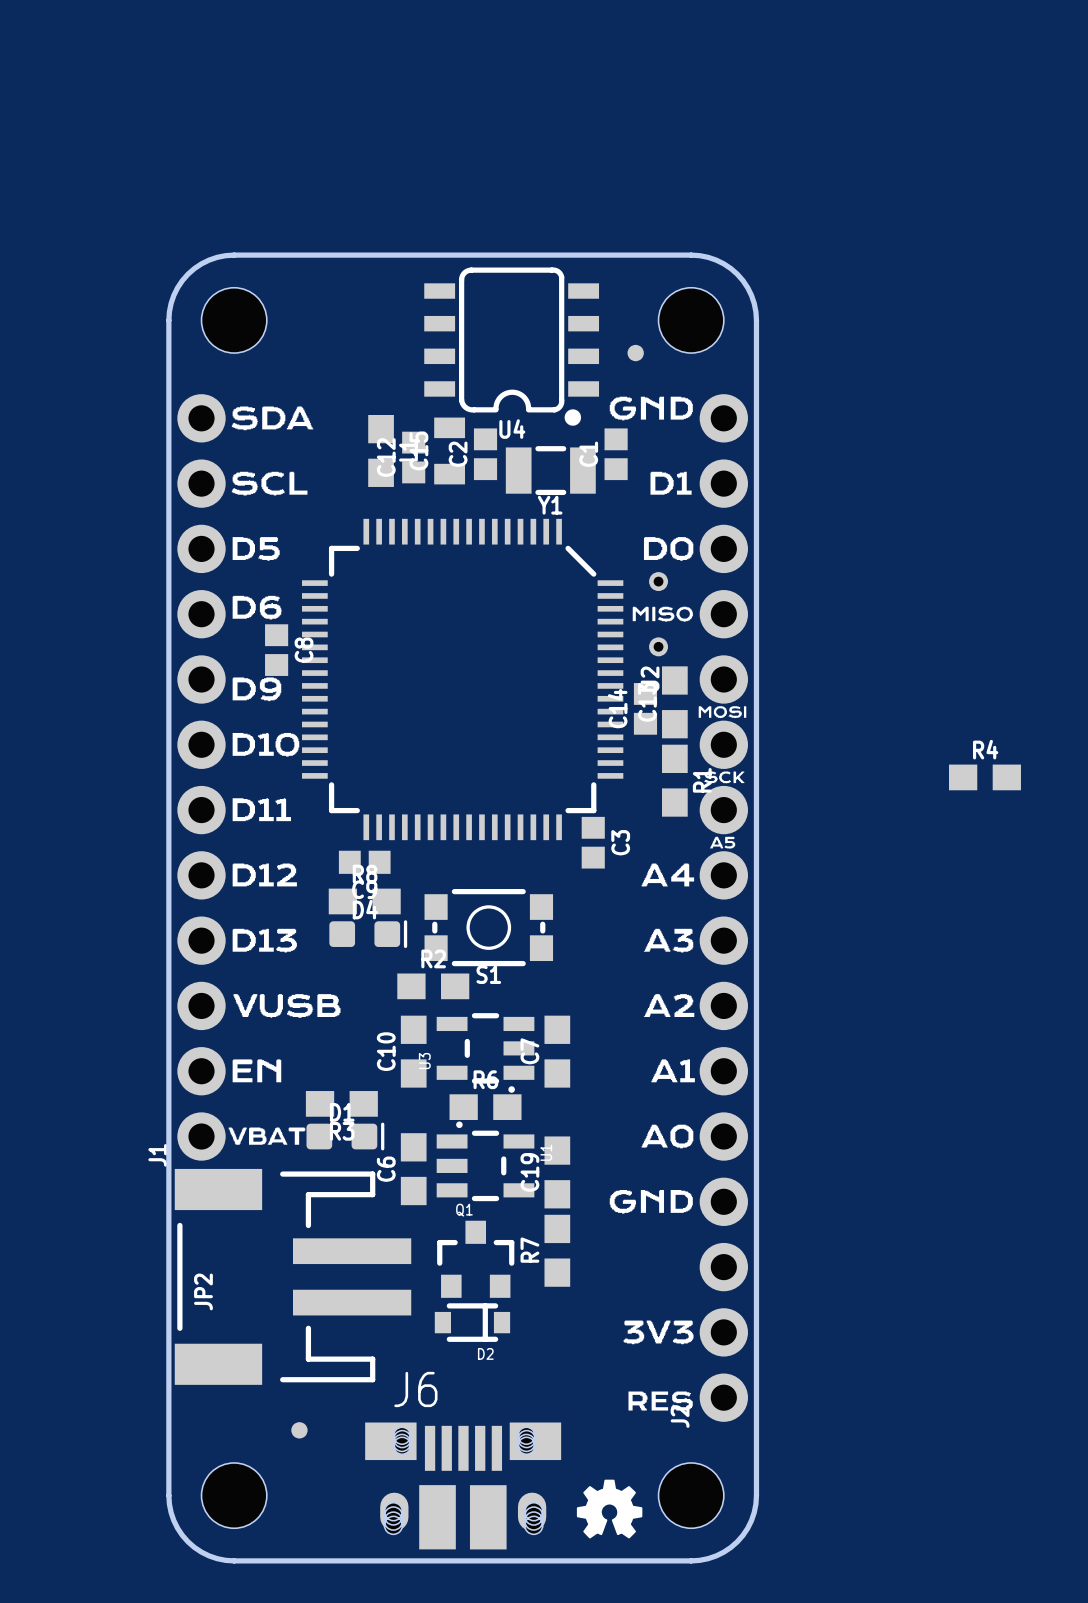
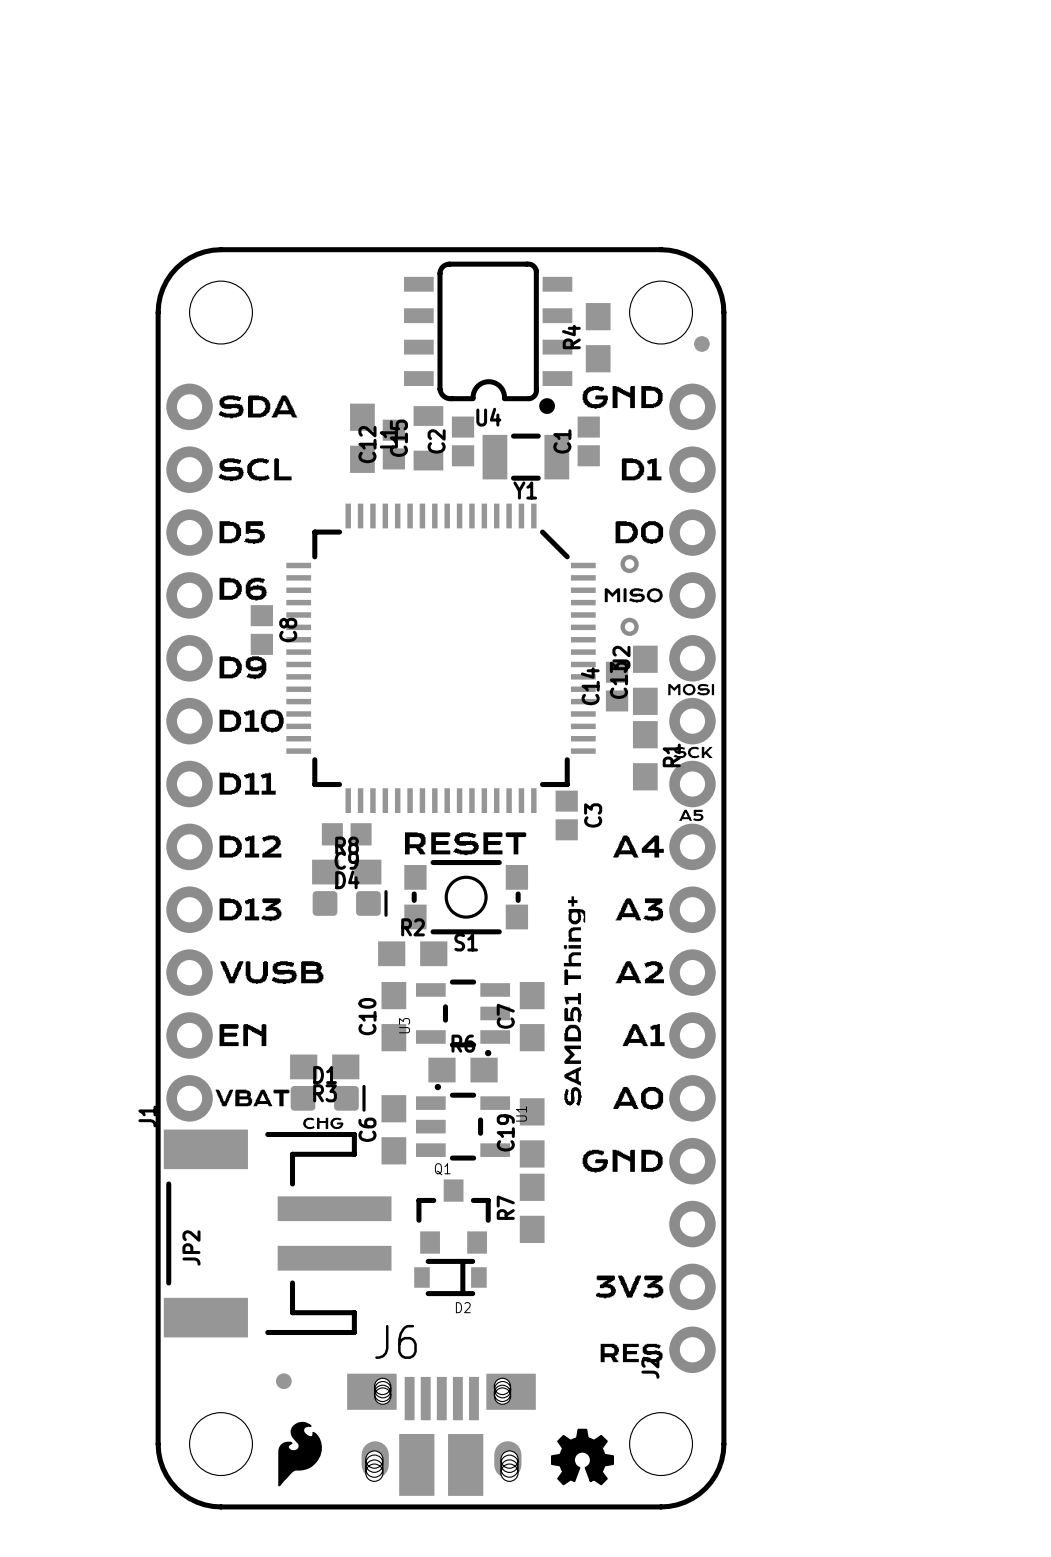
part position: (635, 353) -> (701, 343)
R4 rotation: 0° (984, 777) -> 90° clockwise (598, 337)
R4 position: (984, 777) -> (598, 337)
drawing: none -> [404, 832, 527, 856]
drawing: none -> [563, 896, 586, 1106]
drawing: none -> [303, 1117, 344, 1130]
drawing: none -> [278, 1421, 322, 1487]

